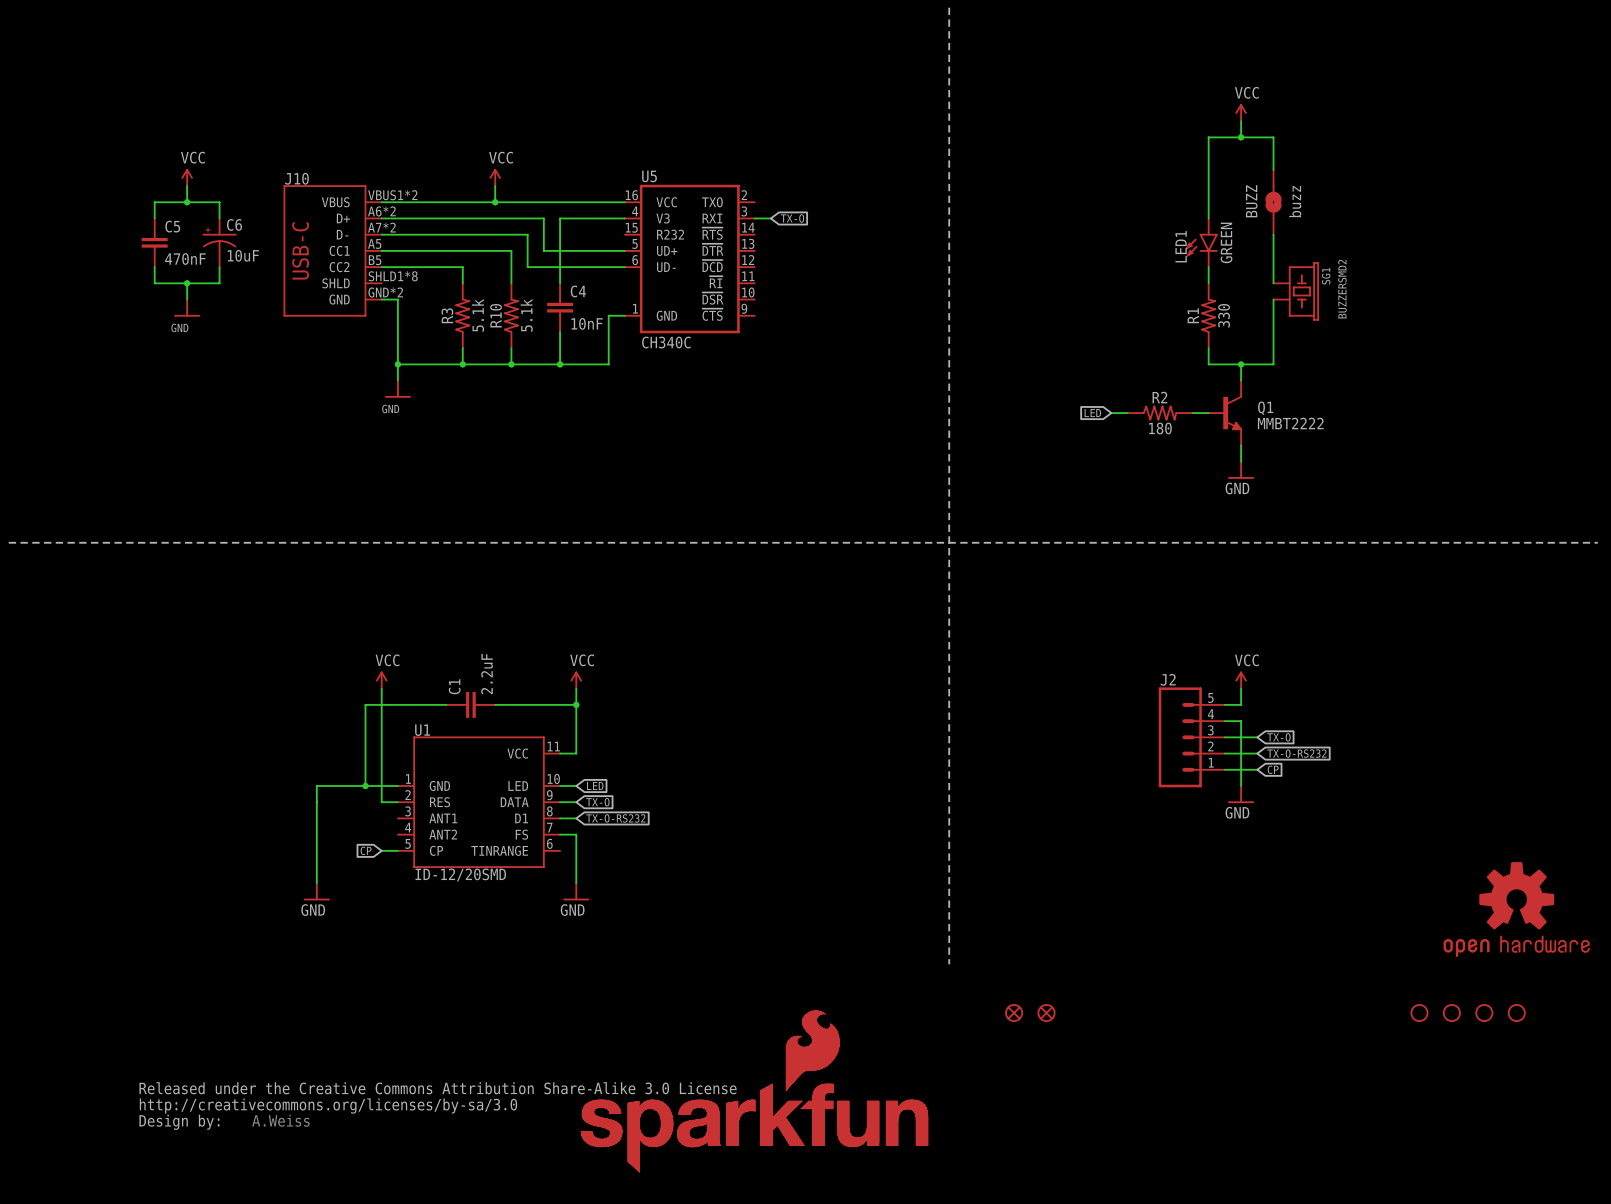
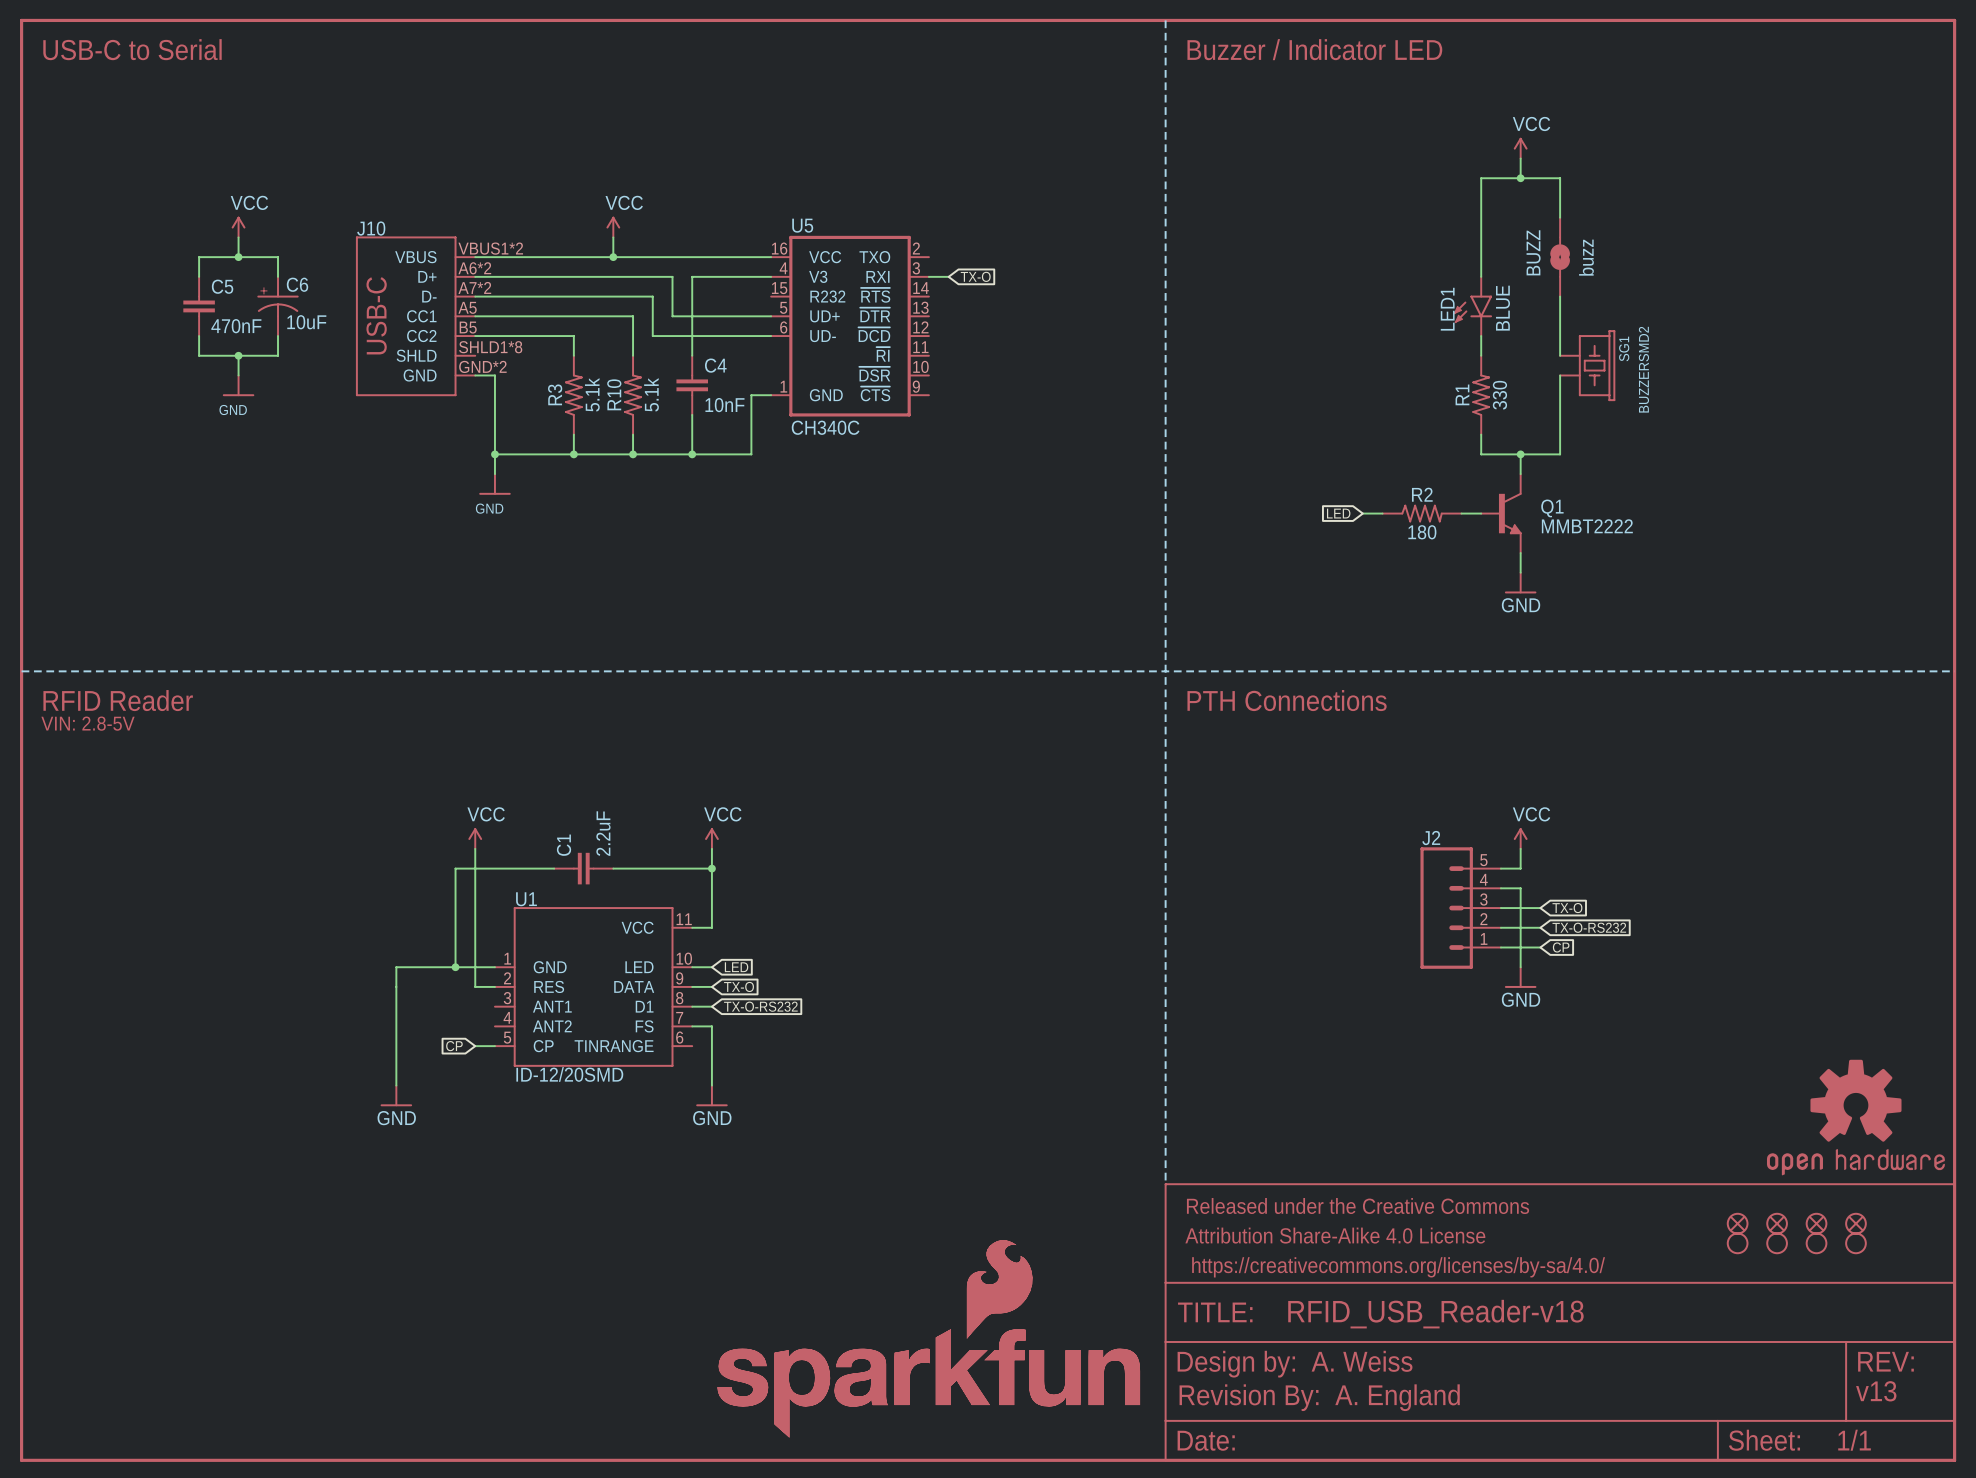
text: none -> USB-C to Serial (132, 49)
text: none -> Buzzer / Indicator LED (1314, 49)
LED1 value: GREEN (1226, 242) -> BLUE (1503, 308)
text: none -> RFID Reader (118, 700)
text: none -> PTH Connections (1287, 700)
text: none -> VIN: 2.8-5V (87, 723)
part: none -> (988, 740)
part: none -> (1737, 1223)
part: none -> (1777, 1223)
part: none -> (1816, 1223)
part: none -> (1855, 1223)
part: (1014, 1013) -> none
part: (1046, 1013) -> none
part: none -> (1560, 1322)
part: (438, 1106) -> none
text: none -> A. Weiss (1362, 1361)
text: A.Weiss (280, 1120) -> none
text: none -> v13 (1876, 1391)
part: none -> (1249, 1397)
text: none -> A. England (1397, 1397)

